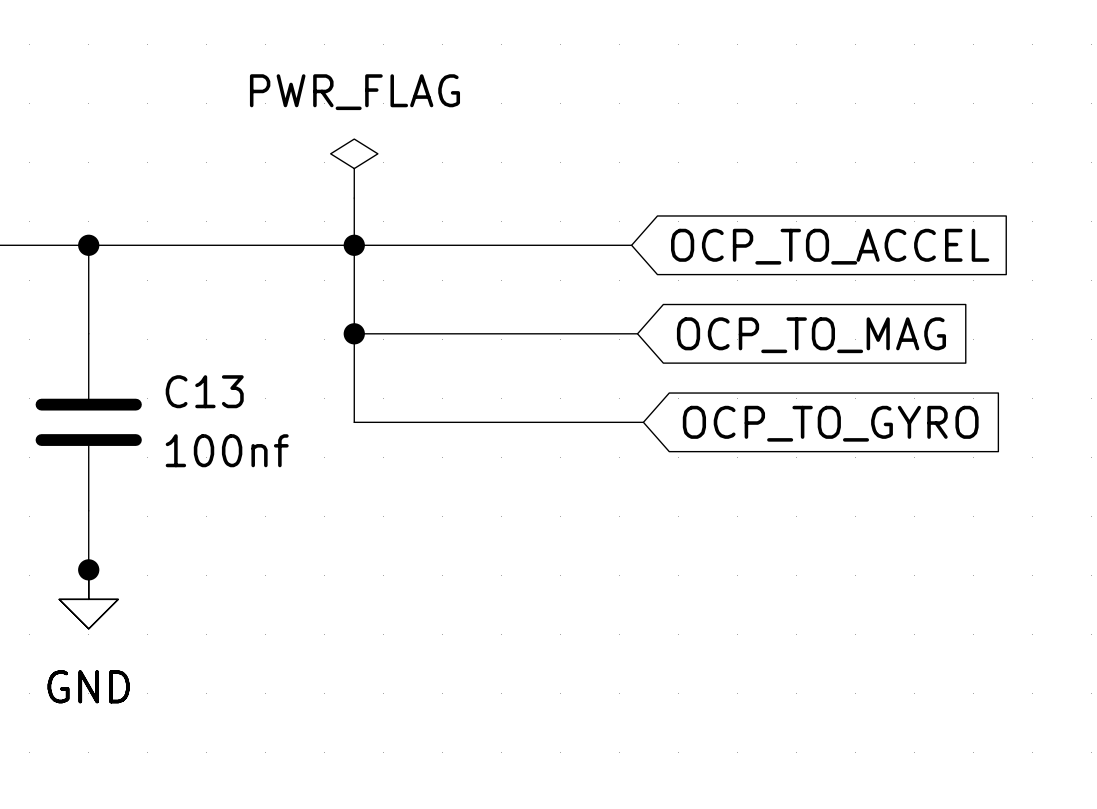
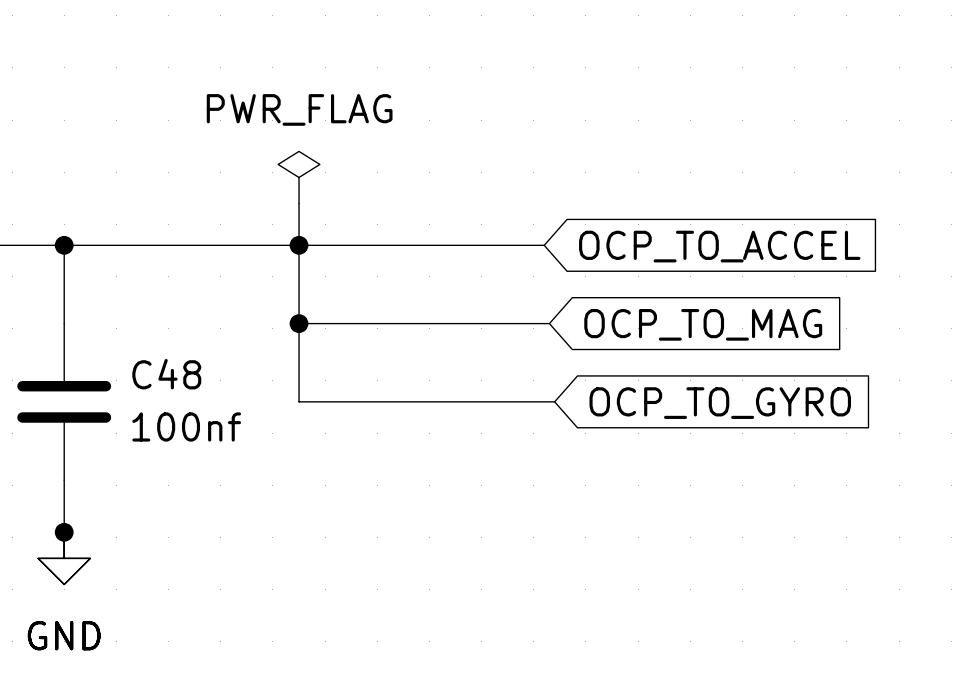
C13 name: C13 (204, 391) -> C48 (166, 374)

